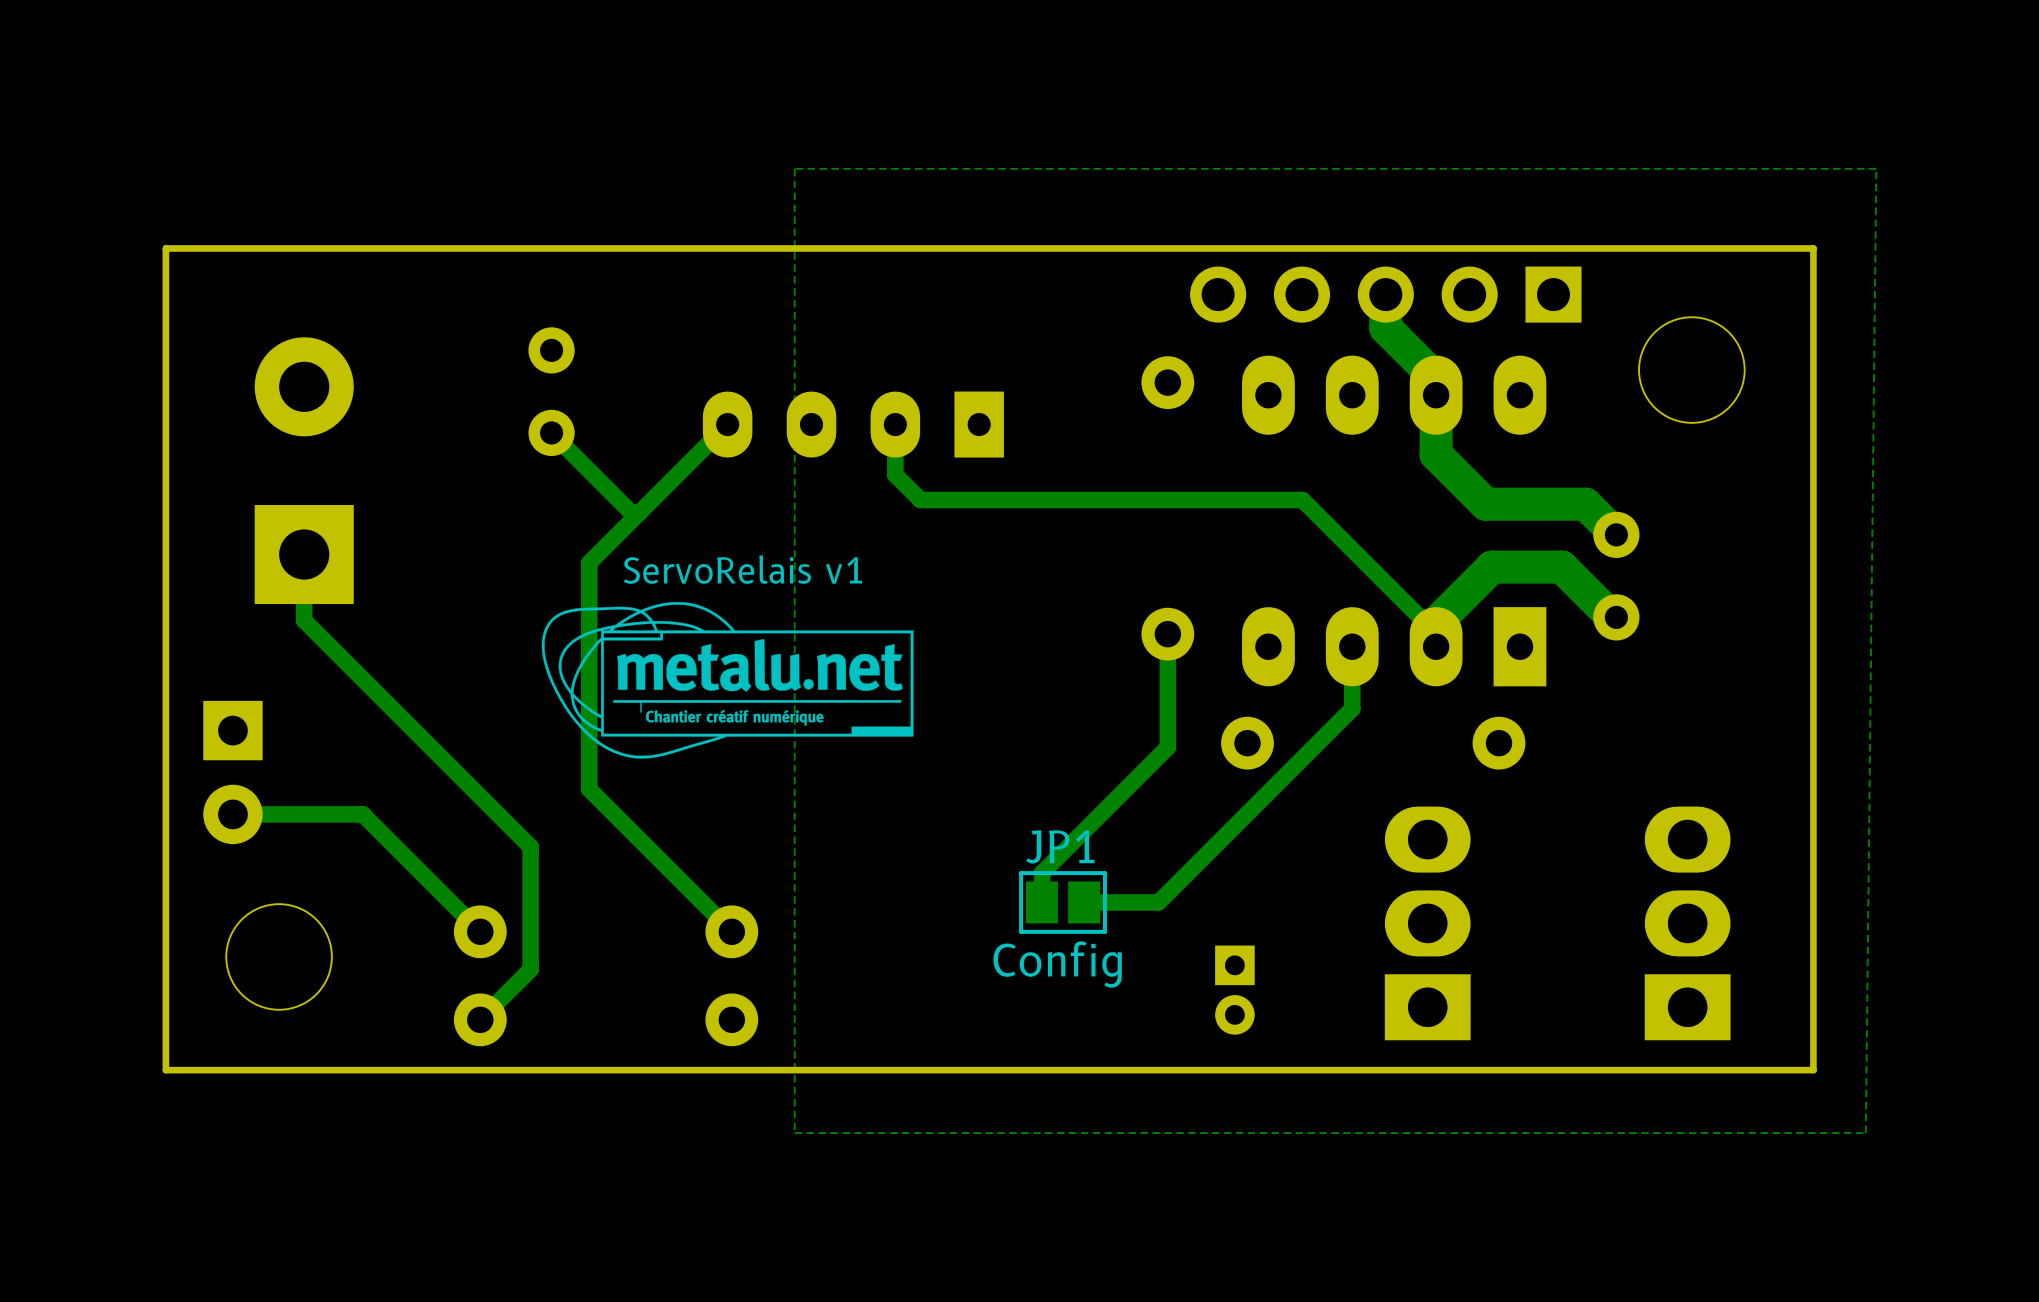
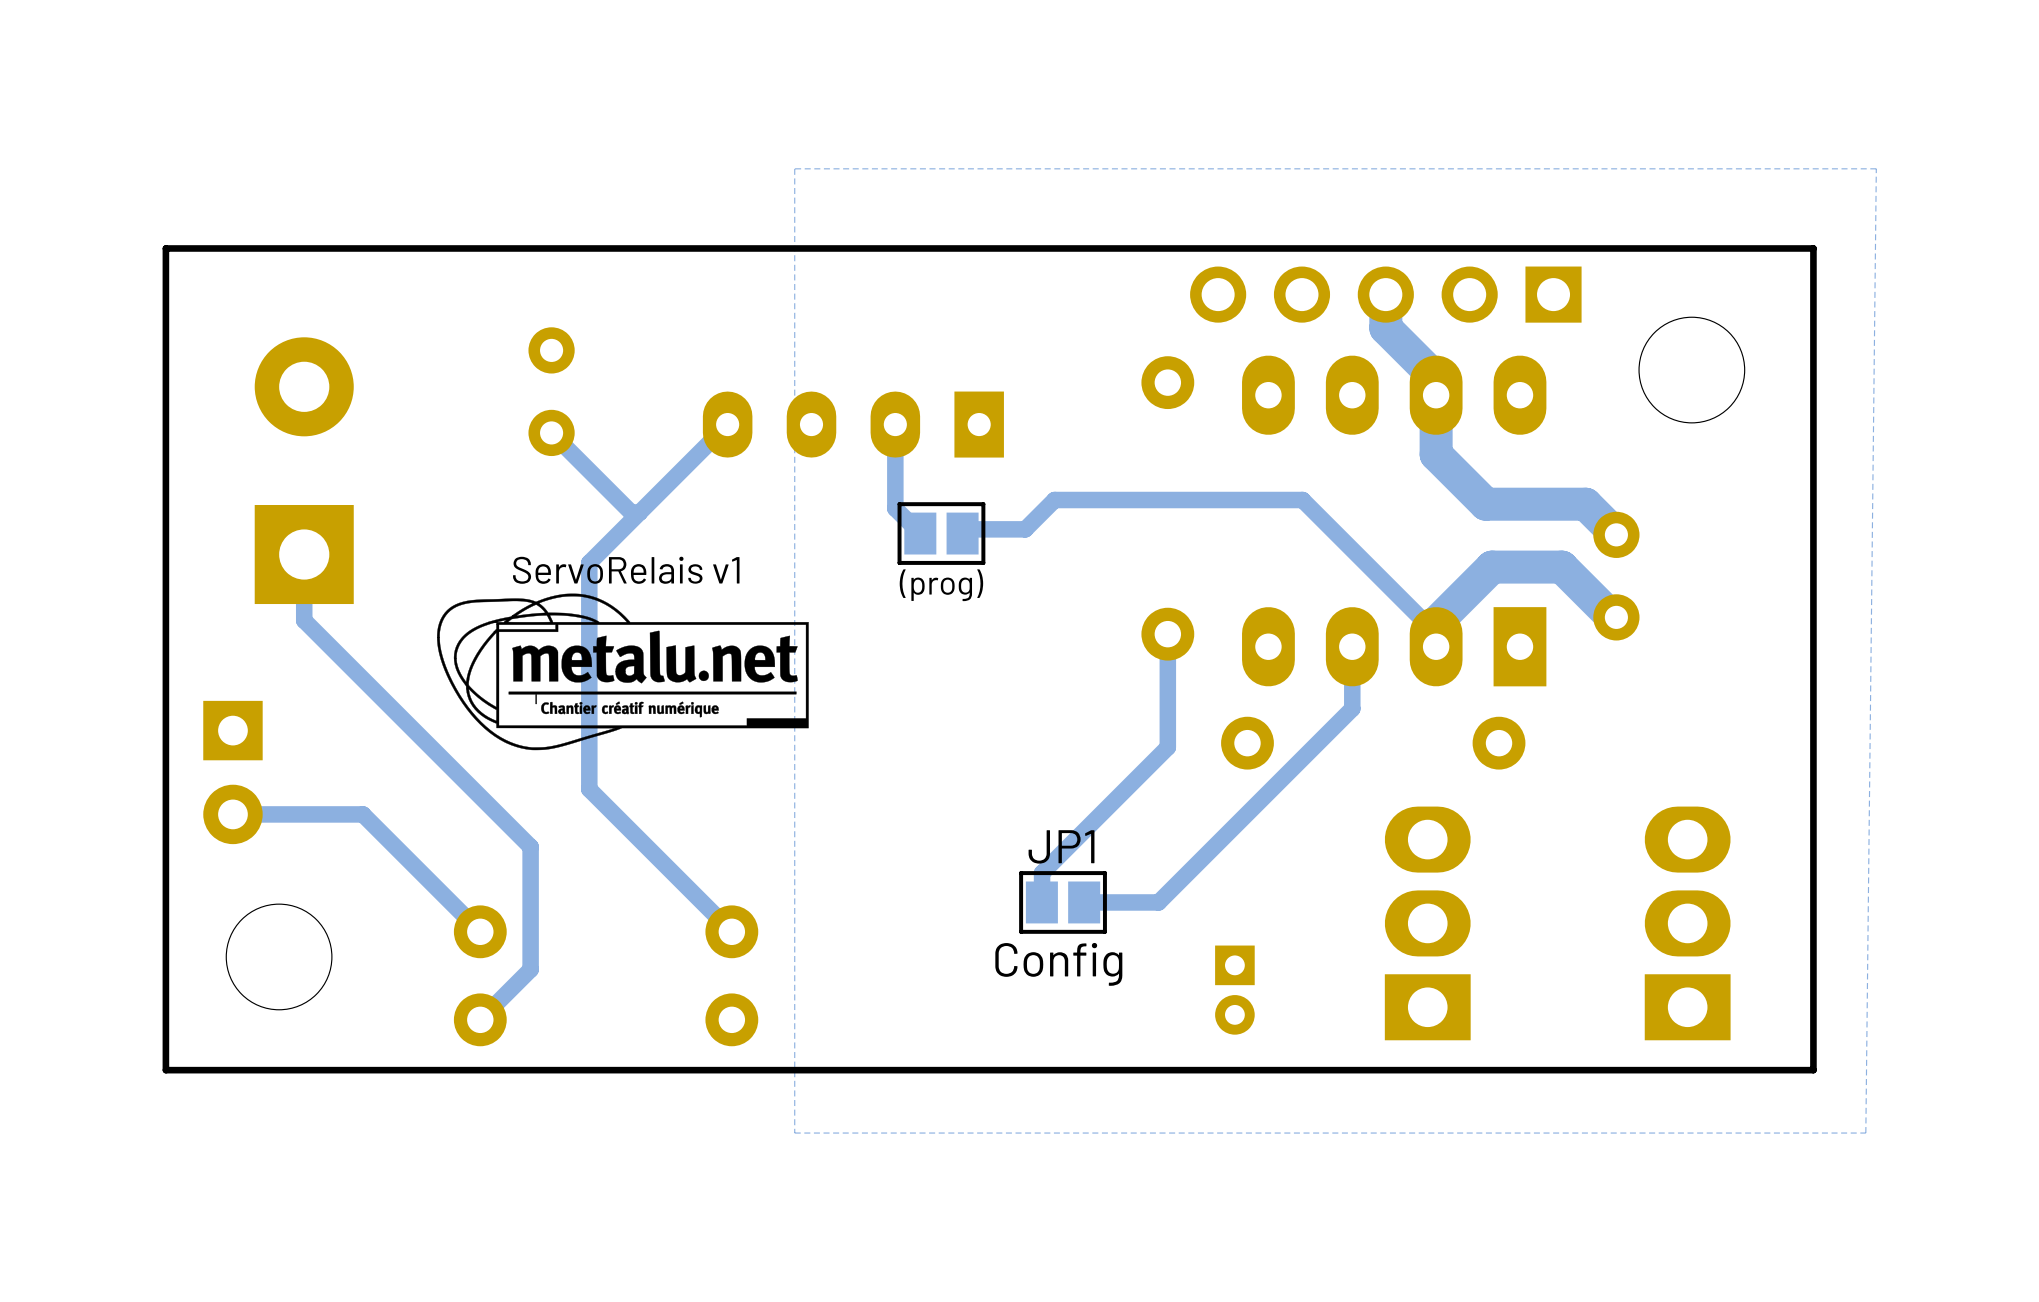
track: (895, 474) (920, 500) (1054, 500) -> (962, 529) (1025, 529) (1054, 500)
track: none -> (895, 474) (895, 508) (920, 533)
part: none -> (prog) (941, 533)
text position: ServoRelais v1 (742, 569) -> ServoRelais v1 (626, 570)
drawing position: (727, 680) -> (622, 671)

